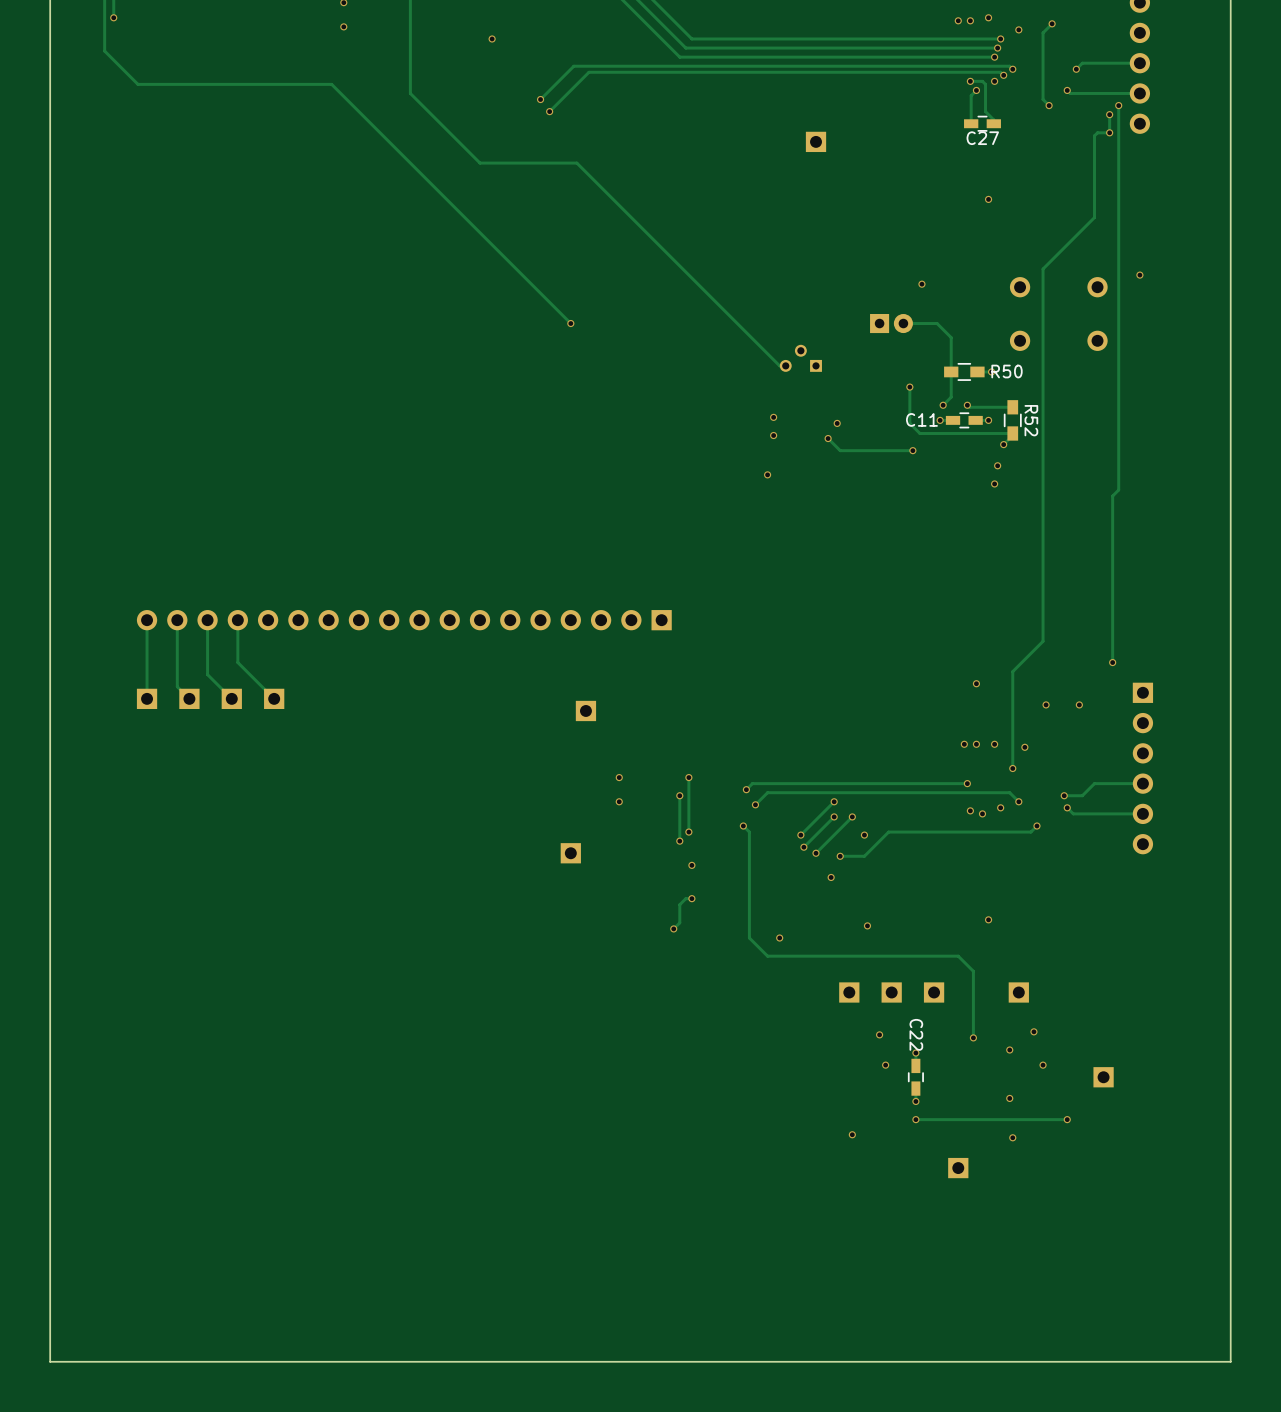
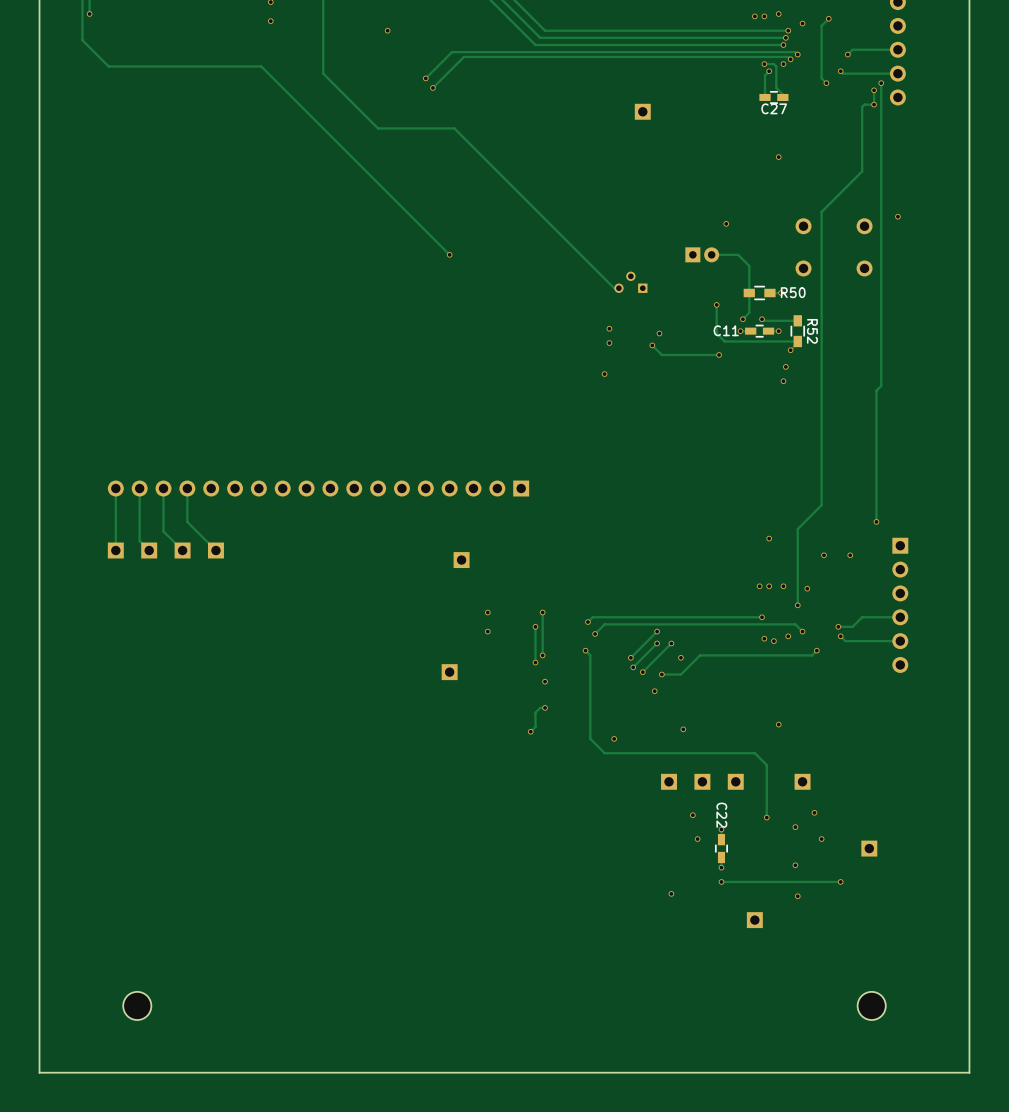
part: none -> (137, 1005)
part: none -> (871, 1005)

